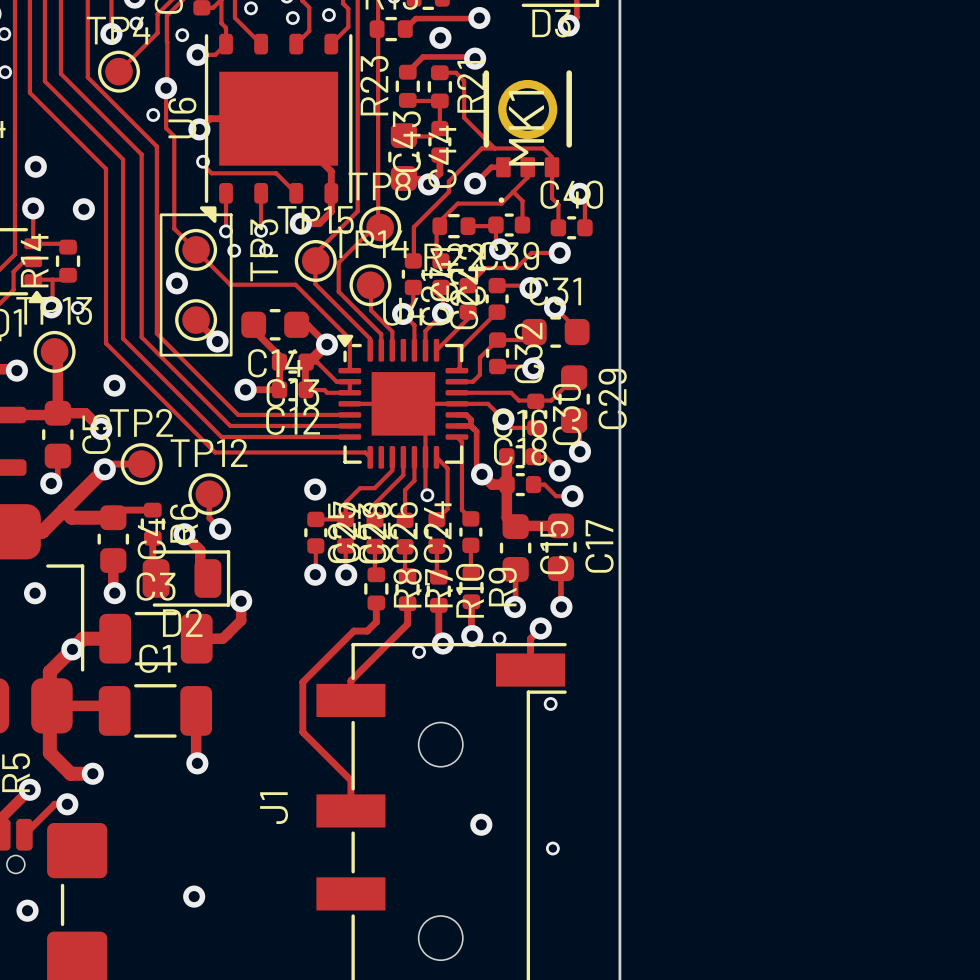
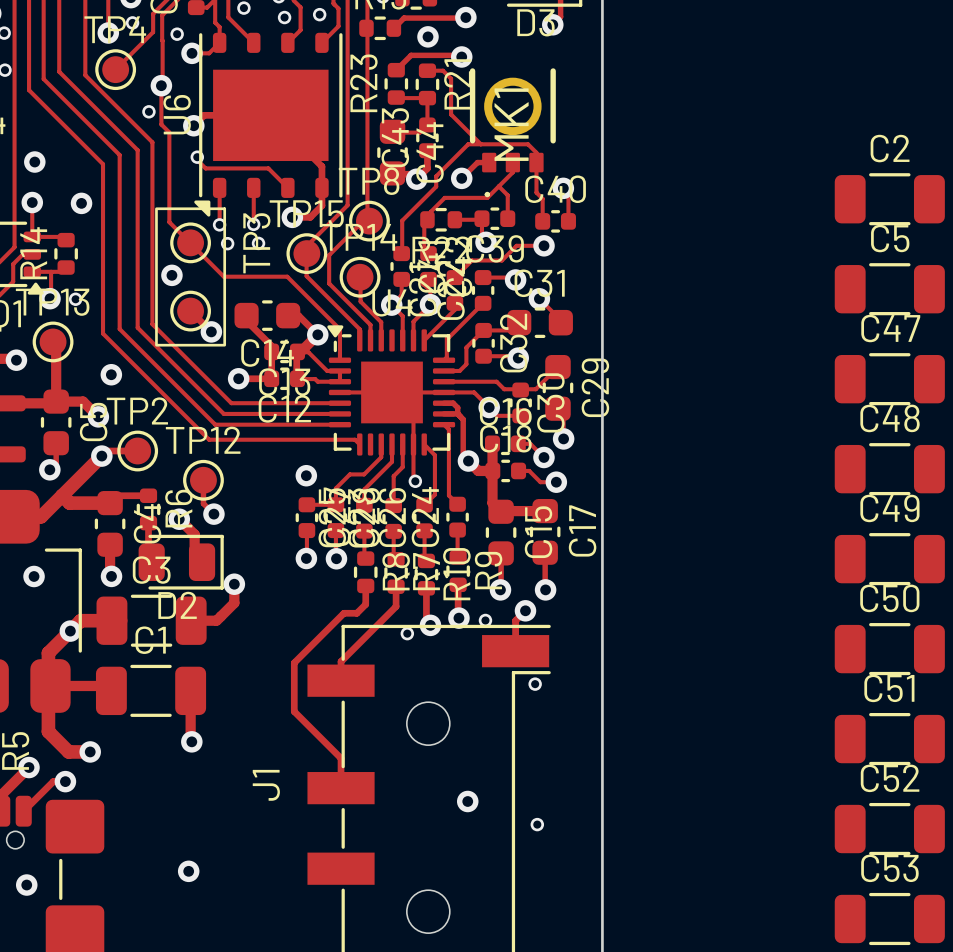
C2: none -> (889, 199)
C5: none -> (889, 289)
C47: none -> (889, 379)
C48: none -> (889, 469)
C49: none -> (889, 559)
C50: none -> (889, 649)
C51: none -> (889, 739)
C52: none -> (889, 829)
C53: none -> (889, 919)

